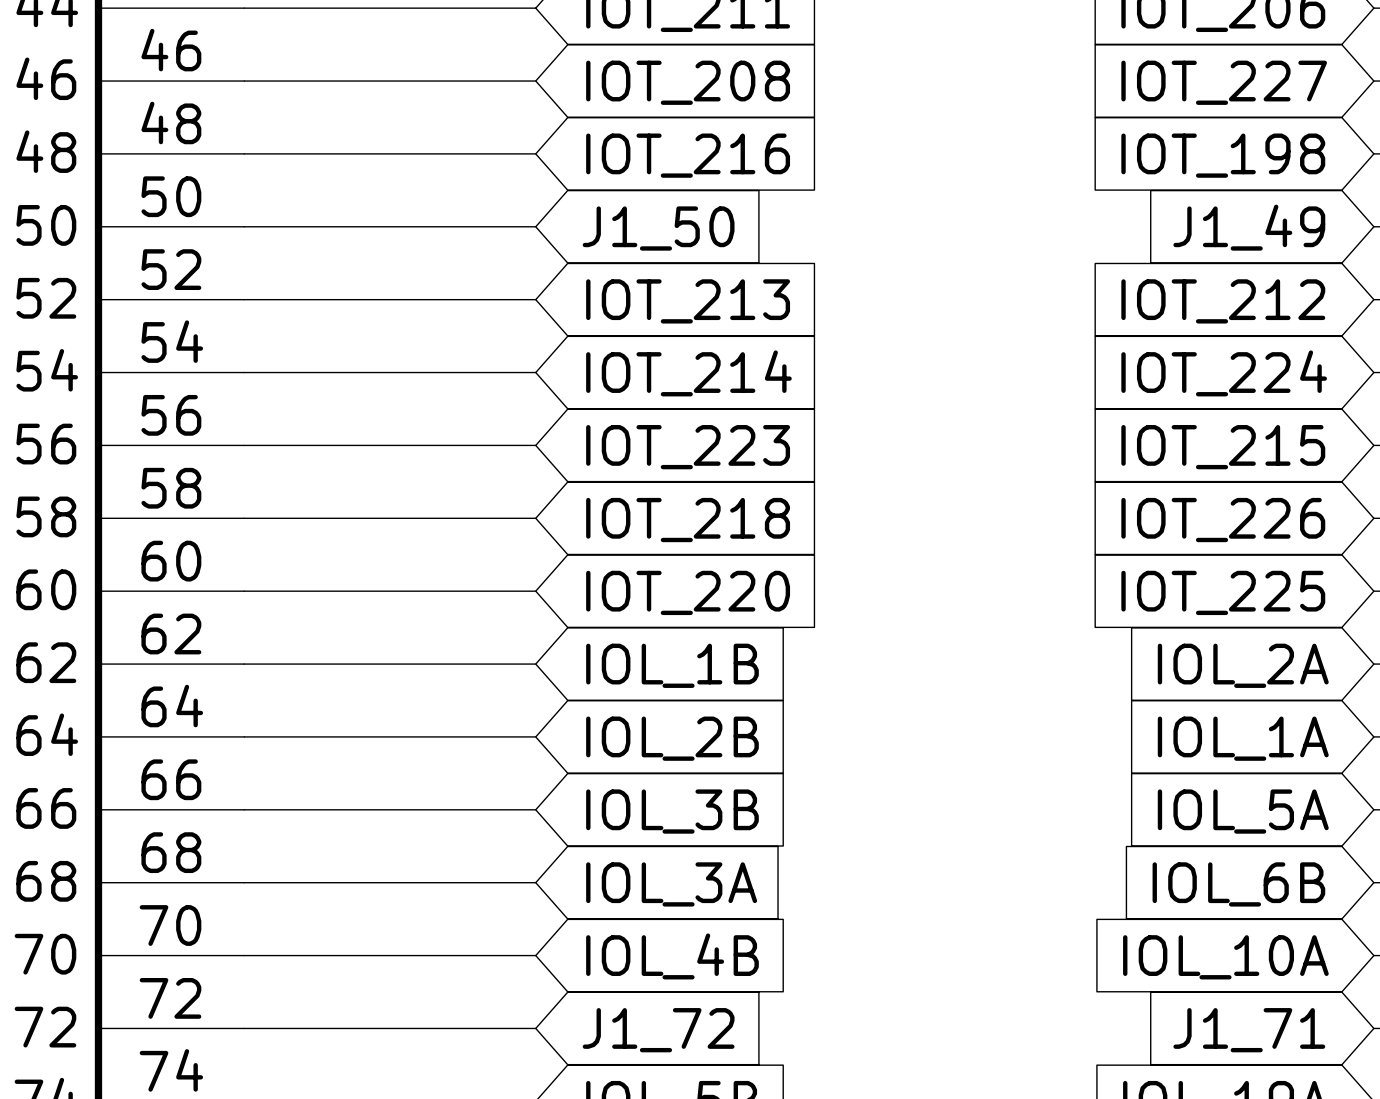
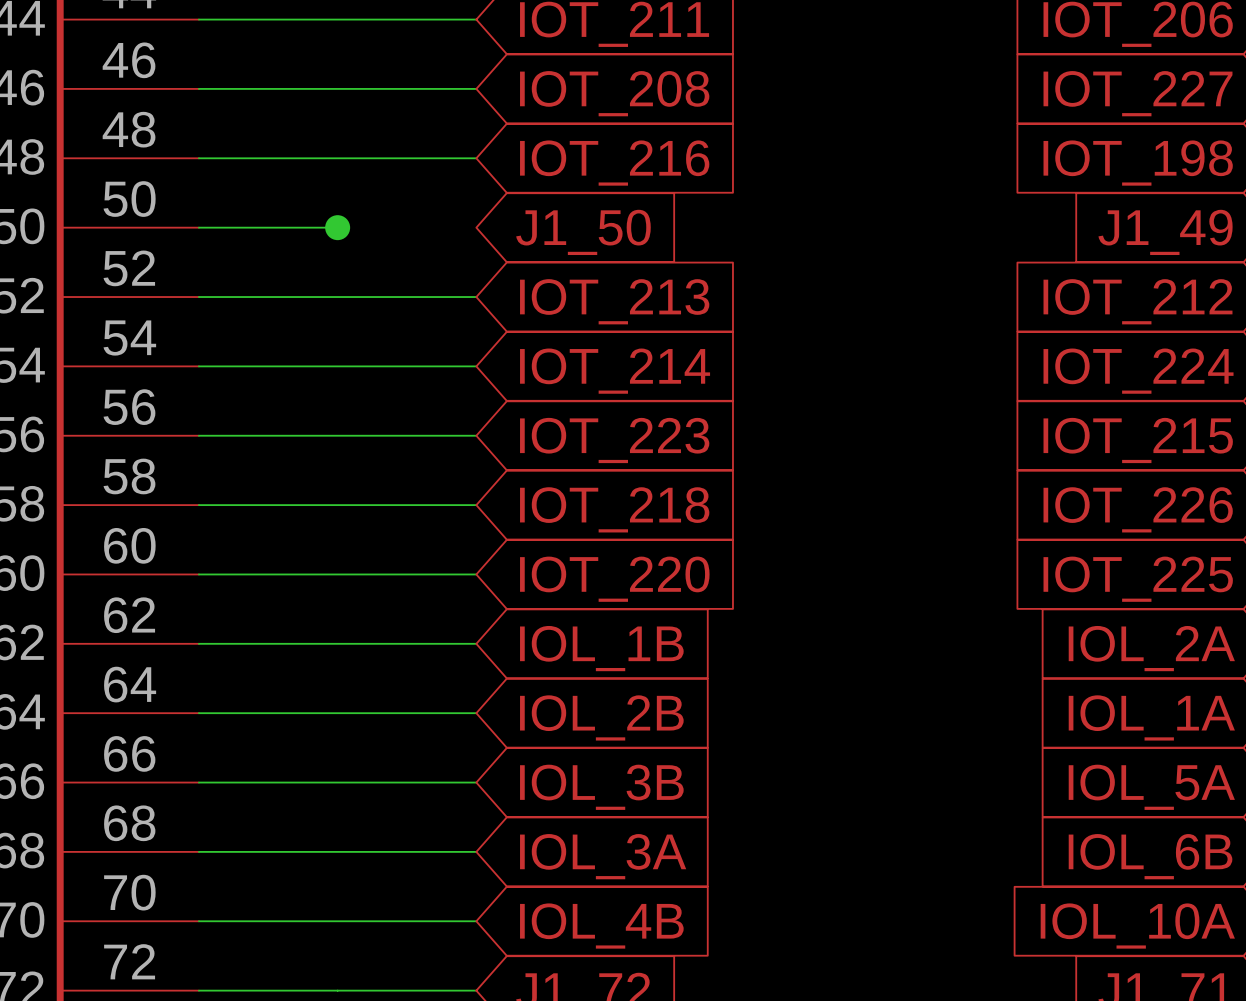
wire: (390, 226) (535, 226) -> none
junction: none -> (337, 227)

